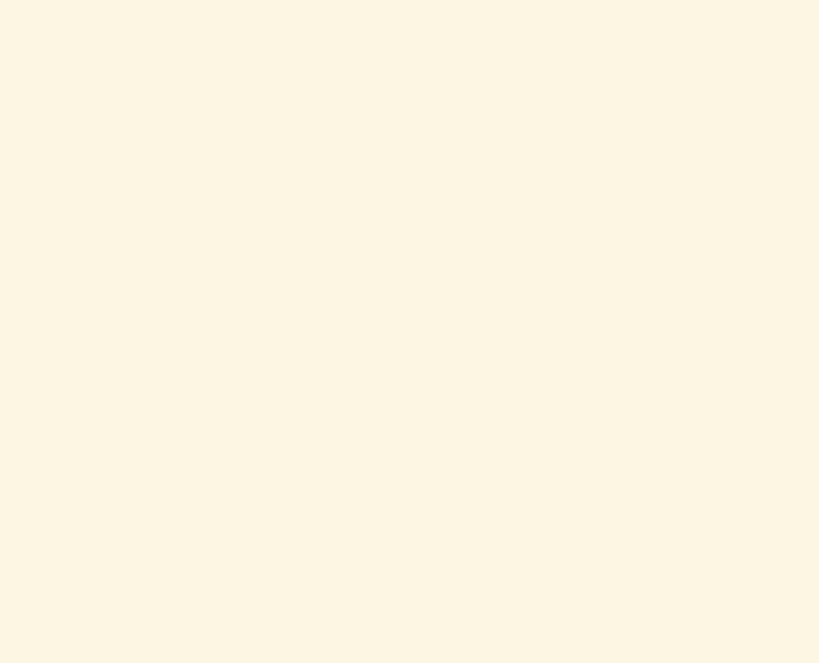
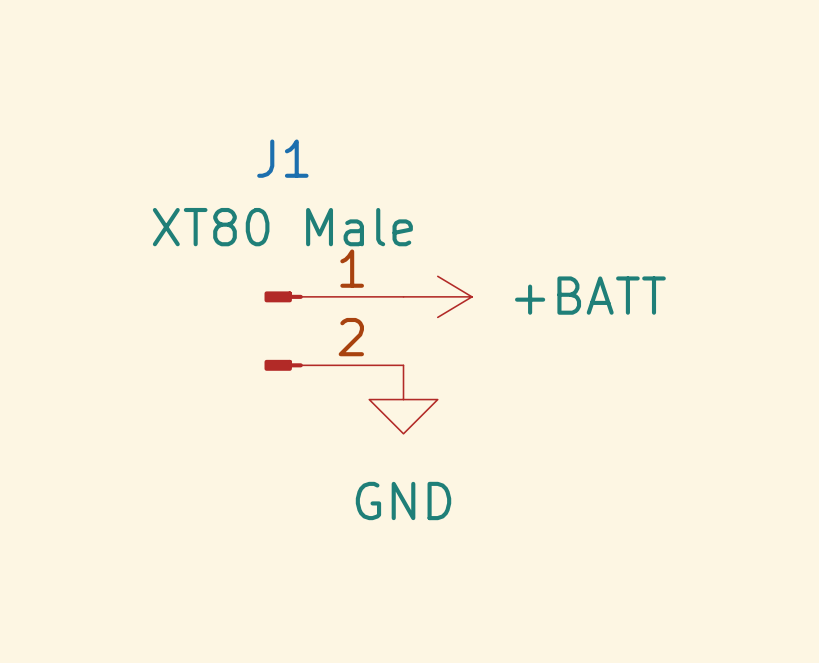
power symbol: none -> +BATT (437, 296)
J1: none -> XT80 Male (334, 331)
power symbol: none -> GND (403, 399)

